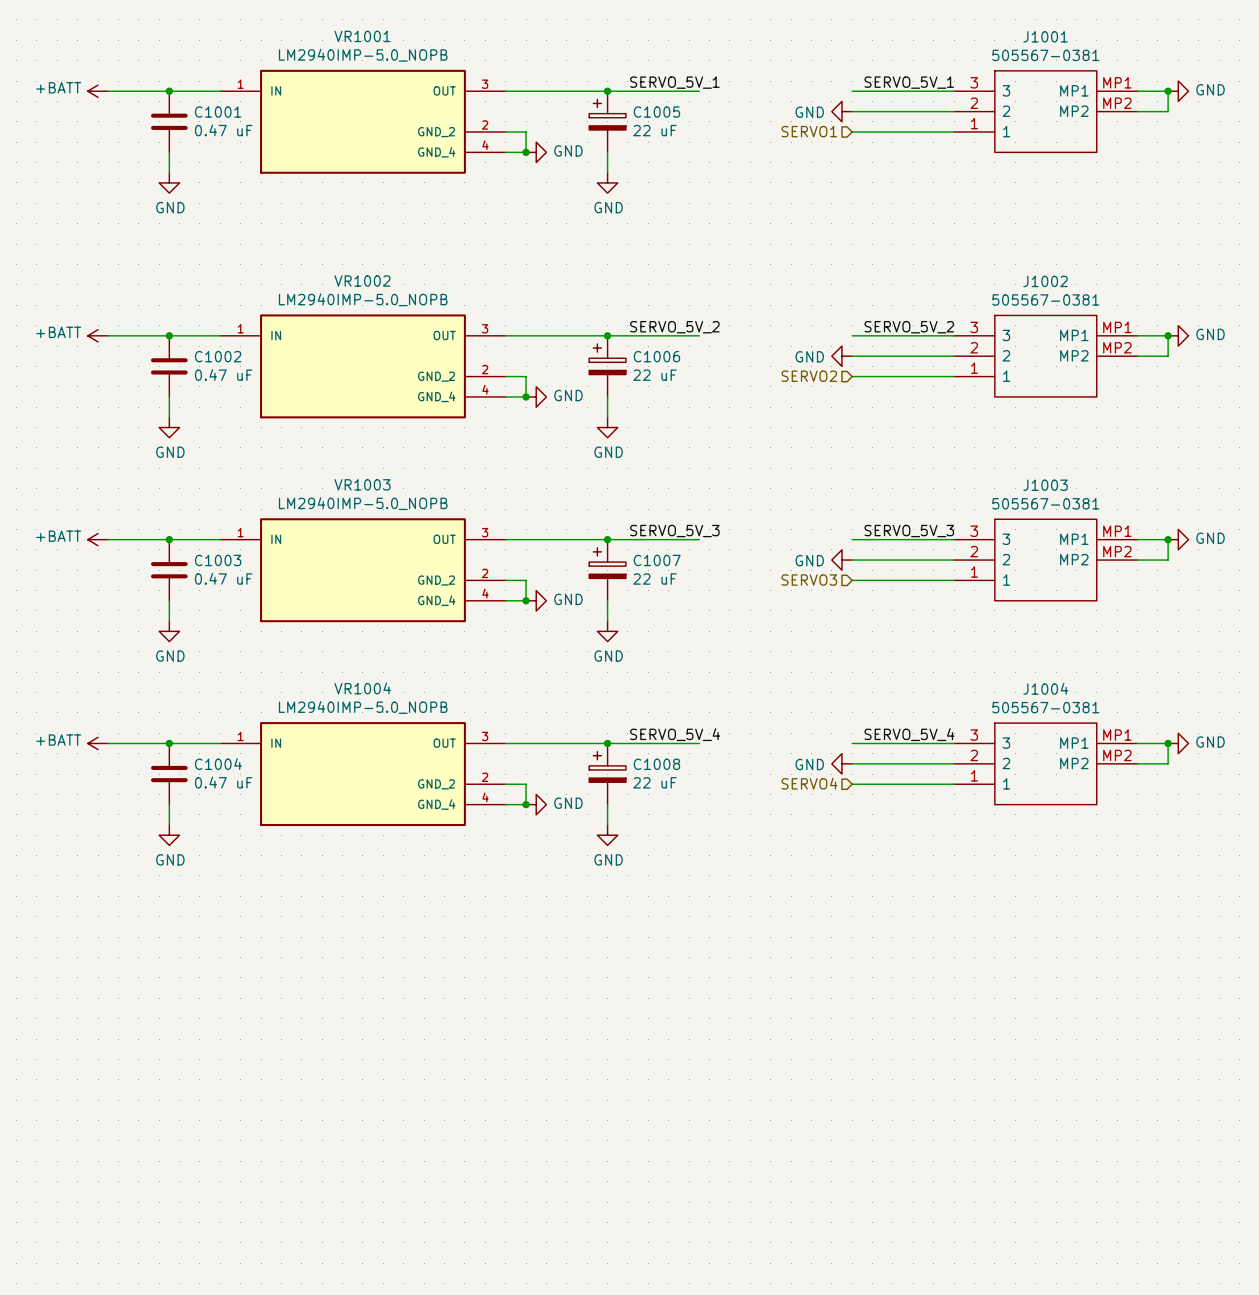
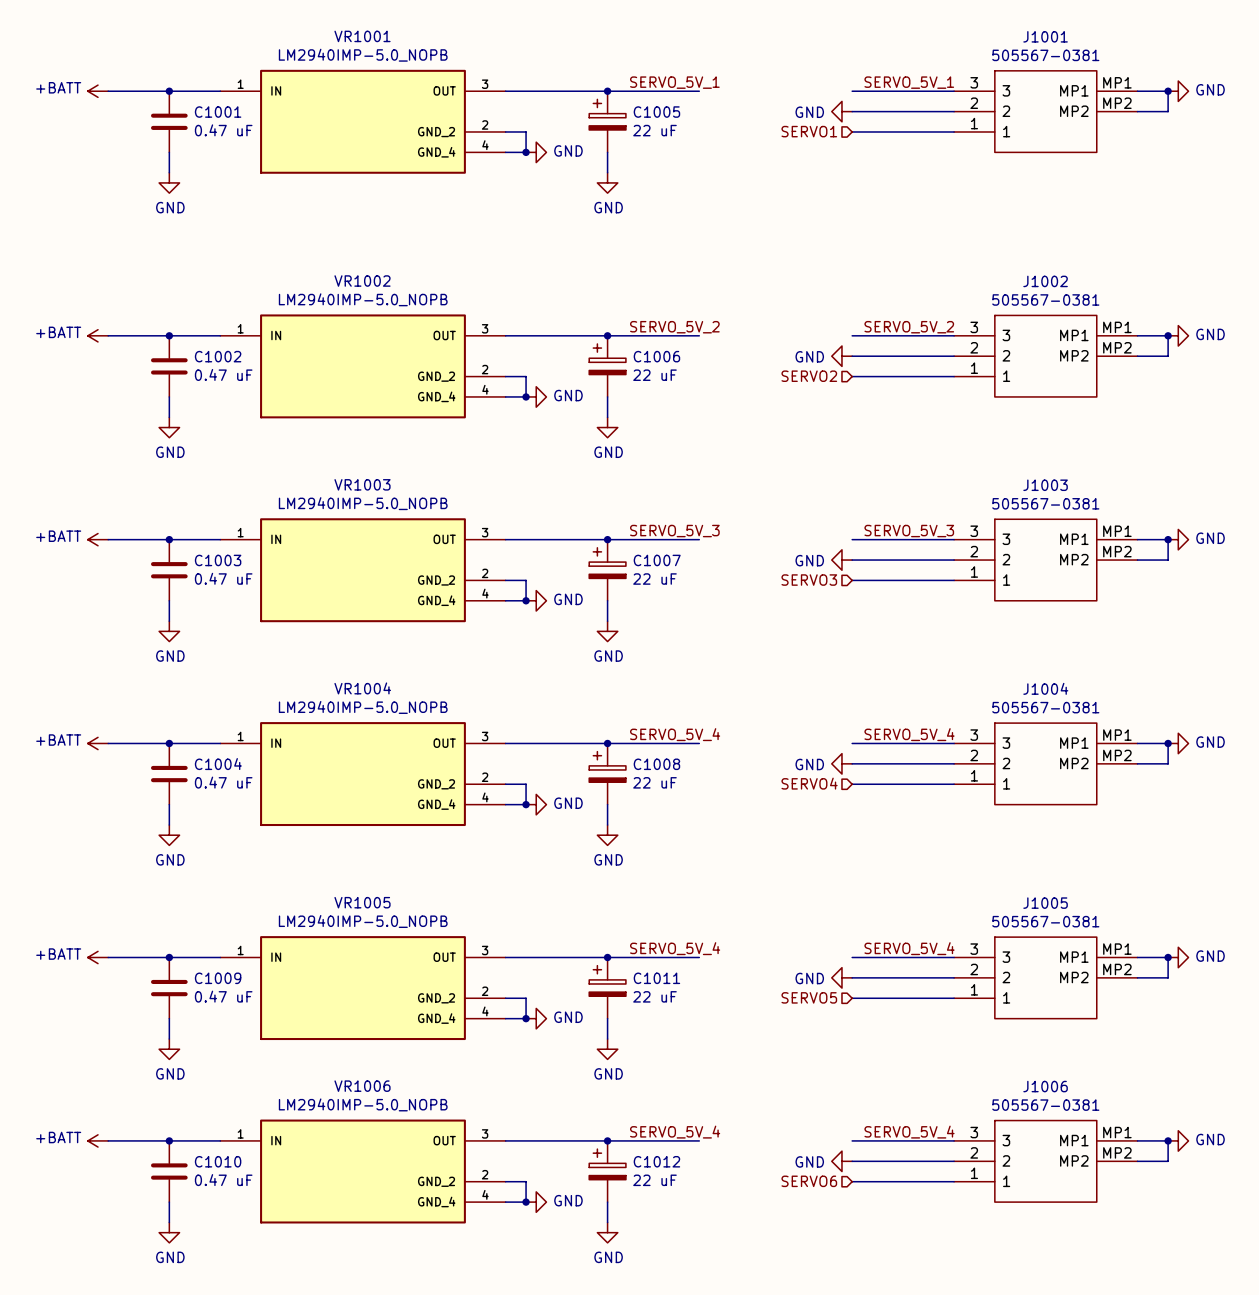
label: none -> SERVO_5V_4 (675, 948)
label: none -> SERVO_5V_4 (909, 948)
power symbol: none -> +BATT (98, 957)
wire: none -> (108, 957) (220, 957)
junction: none -> (169, 957)
wire: none -> (505, 957) (699, 957)
junction: none -> (607, 957)
wire: none -> (852, 957) (954, 957)
wire: none -> (1137, 957) (1168, 957) (1168, 977) (1137, 977)
junction: none -> (1168, 957)
power symbol: none -> GND (1178, 957)
power symbol: none -> GND (841, 977)
wire: none -> (852, 977) (954, 977)
J1005: none -> 505567-0381 (1045, 977)
C1009: none -> 0.47 uF (169, 988)
VR1005: none -> LM2940IMP-5.0_NOPB (362, 988)
C1011: none -> 22 uF (607, 988)
hierarchical label: none -> SERVO5 (809, 997)
wire: none -> (505, 998) (526, 998) (526, 1018) (505, 1018)
wire: none -> (852, 998) (954, 998)
wire: none -> (169, 1018) (169, 1039)
junction: none -> (526, 1018)
power symbol: none -> GND (536, 1018)
wire: none -> (607, 1018) (607, 1039)
power symbol: none -> GND (169, 1049)
power symbol: none -> GND (607, 1049)
label: none -> SERVO_5V_4 (675, 1132)
label: none -> SERVO_5V_4 (909, 1132)
power symbol: none -> +BATT (98, 1140)
wire: none -> (108, 1140) (220, 1140)
junction: none -> (169, 1140)
wire: none -> (505, 1140) (699, 1140)
junction: none -> (607, 1140)
wire: none -> (852, 1140) (954, 1140)
wire: none -> (1137, 1140) (1168, 1140) (1168, 1161) (1137, 1161)
junction: none -> (1168, 1140)
power symbol: none -> GND (1178, 1140)
power symbol: none -> GND (841, 1161)
wire: none -> (852, 1161) (954, 1161)
J1006: none -> 505567-0381 (1045, 1161)
C1010: none -> 0.47 uF (169, 1171)
VR1006: none -> LM2940IMP-5.0_NOPB (362, 1171)
C1012: none -> 22 uF (607, 1171)
wire: none -> (505, 1181) (526, 1181) (526, 1202) (505, 1202)
hierarchical label: none -> SERVO6 (809, 1181)
wire: none -> (852, 1181) (954, 1181)
wire: none -> (169, 1202) (169, 1222)
junction: none -> (526, 1202)
power symbol: none -> GND (536, 1202)
wire: none -> (607, 1202) (607, 1222)
power symbol: none -> GND (169, 1232)
power symbol: none -> GND (607, 1232)

